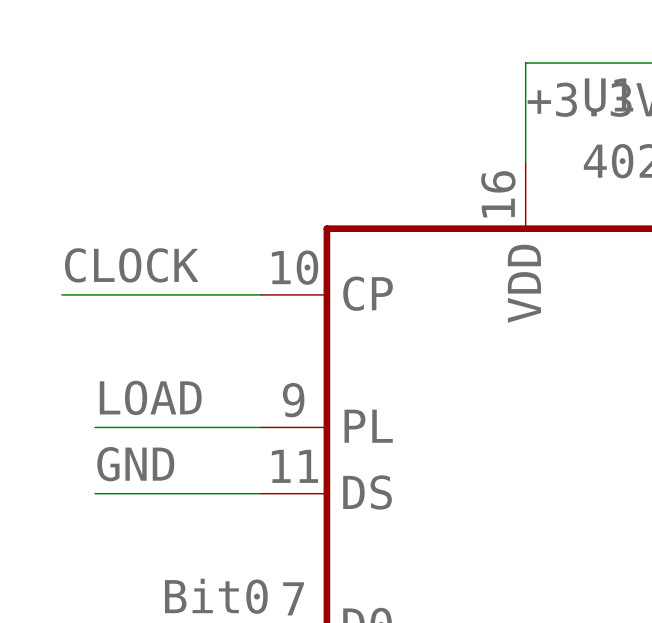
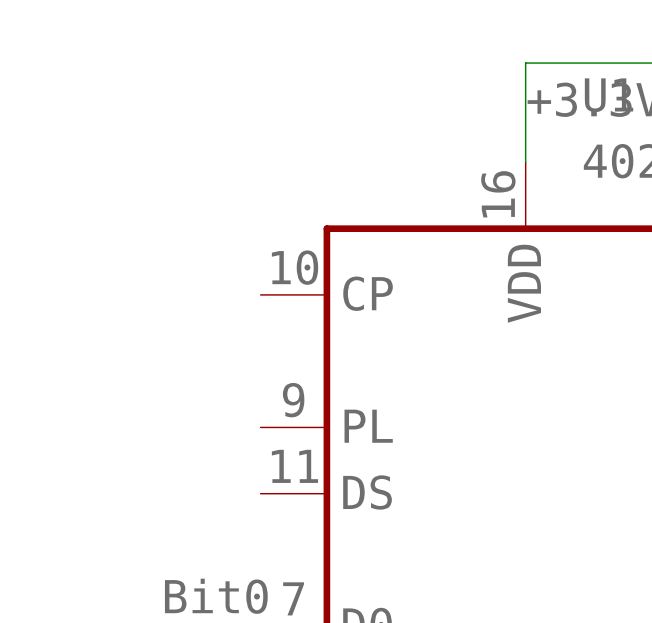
label: CLOCK (131, 265) -> none
wire: (61, 294) (260, 294) -> none
label: LOAD (150, 397) -> none
wire: (95, 427) (260, 427) -> none
label: GND (135, 464) -> none
wire: (95, 493) (260, 493) -> none

